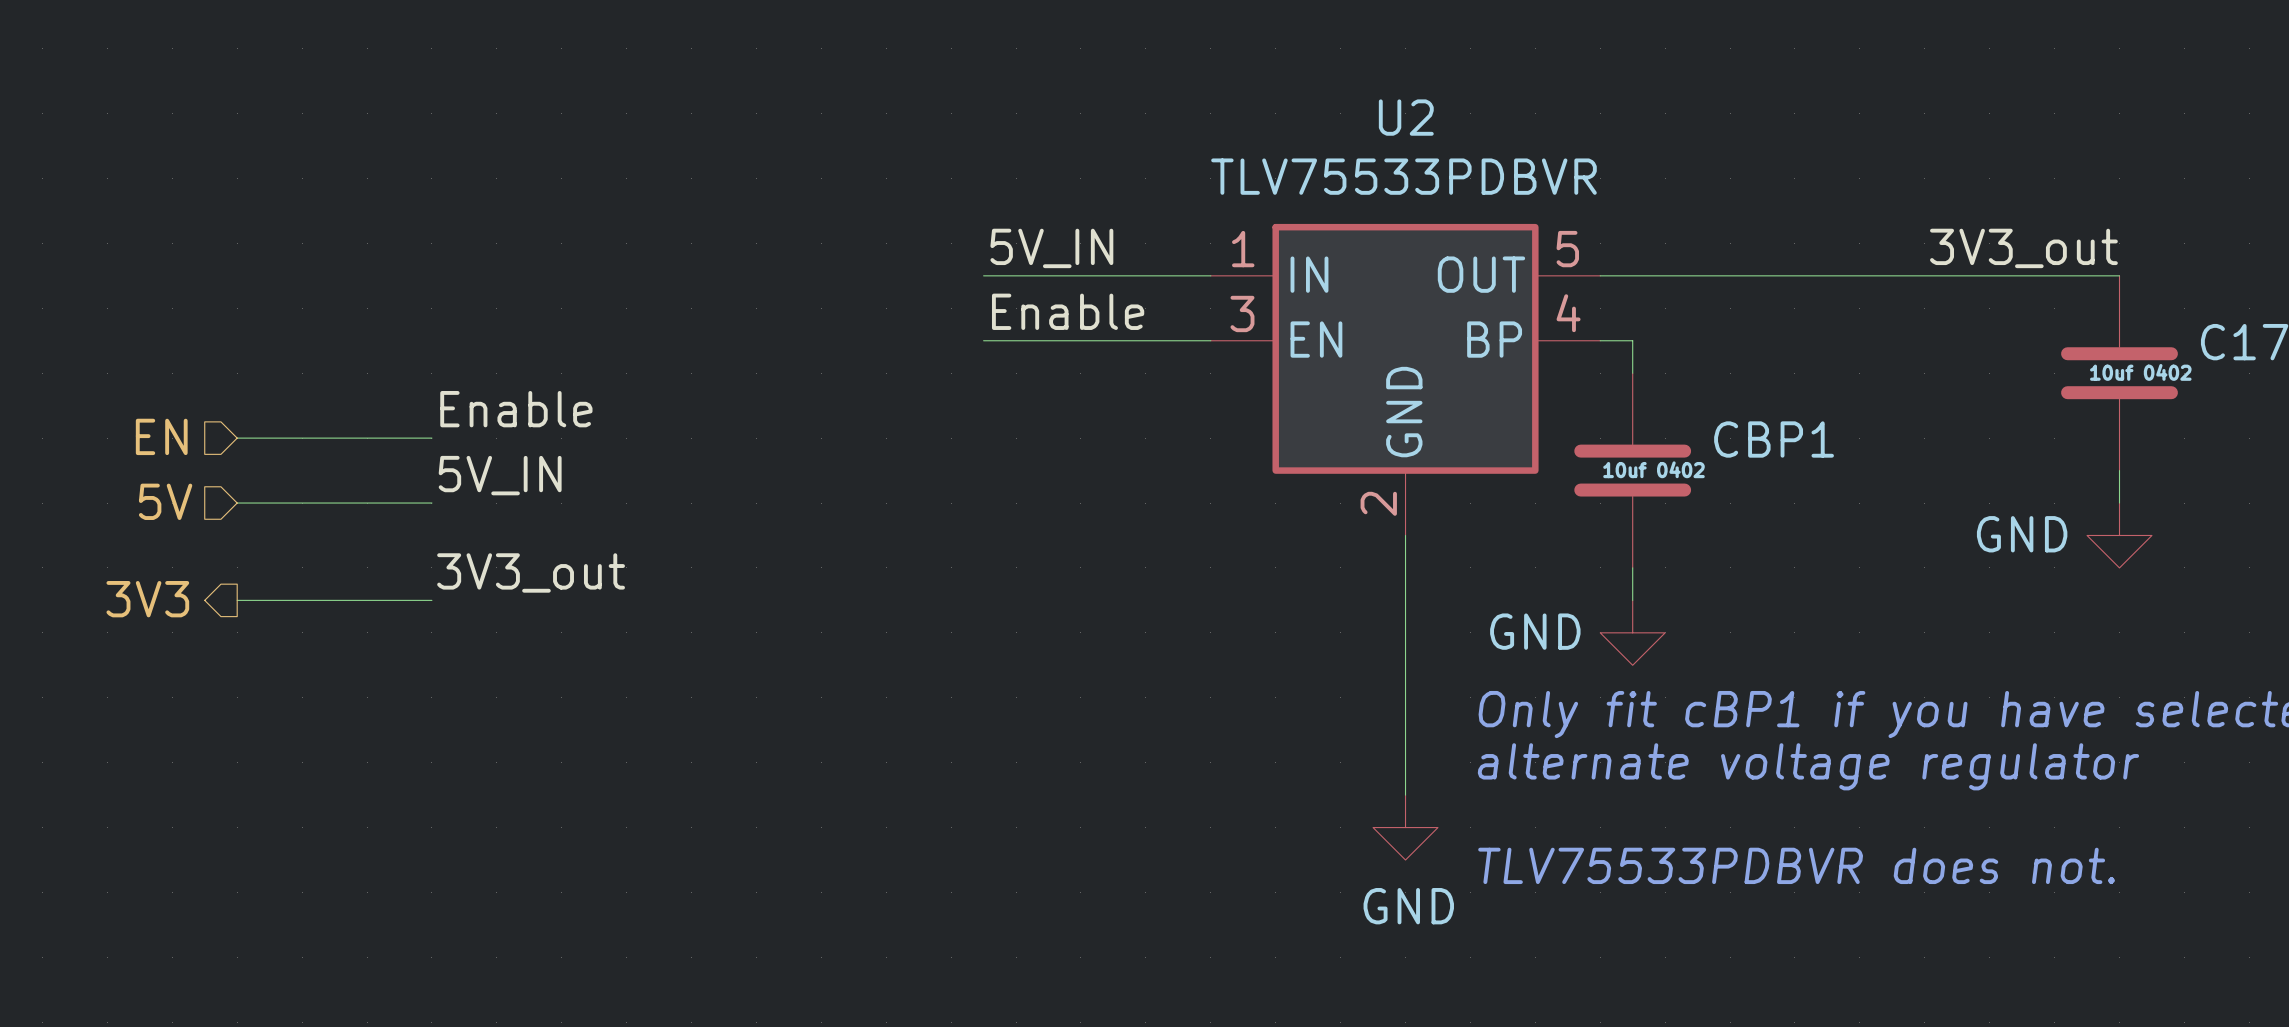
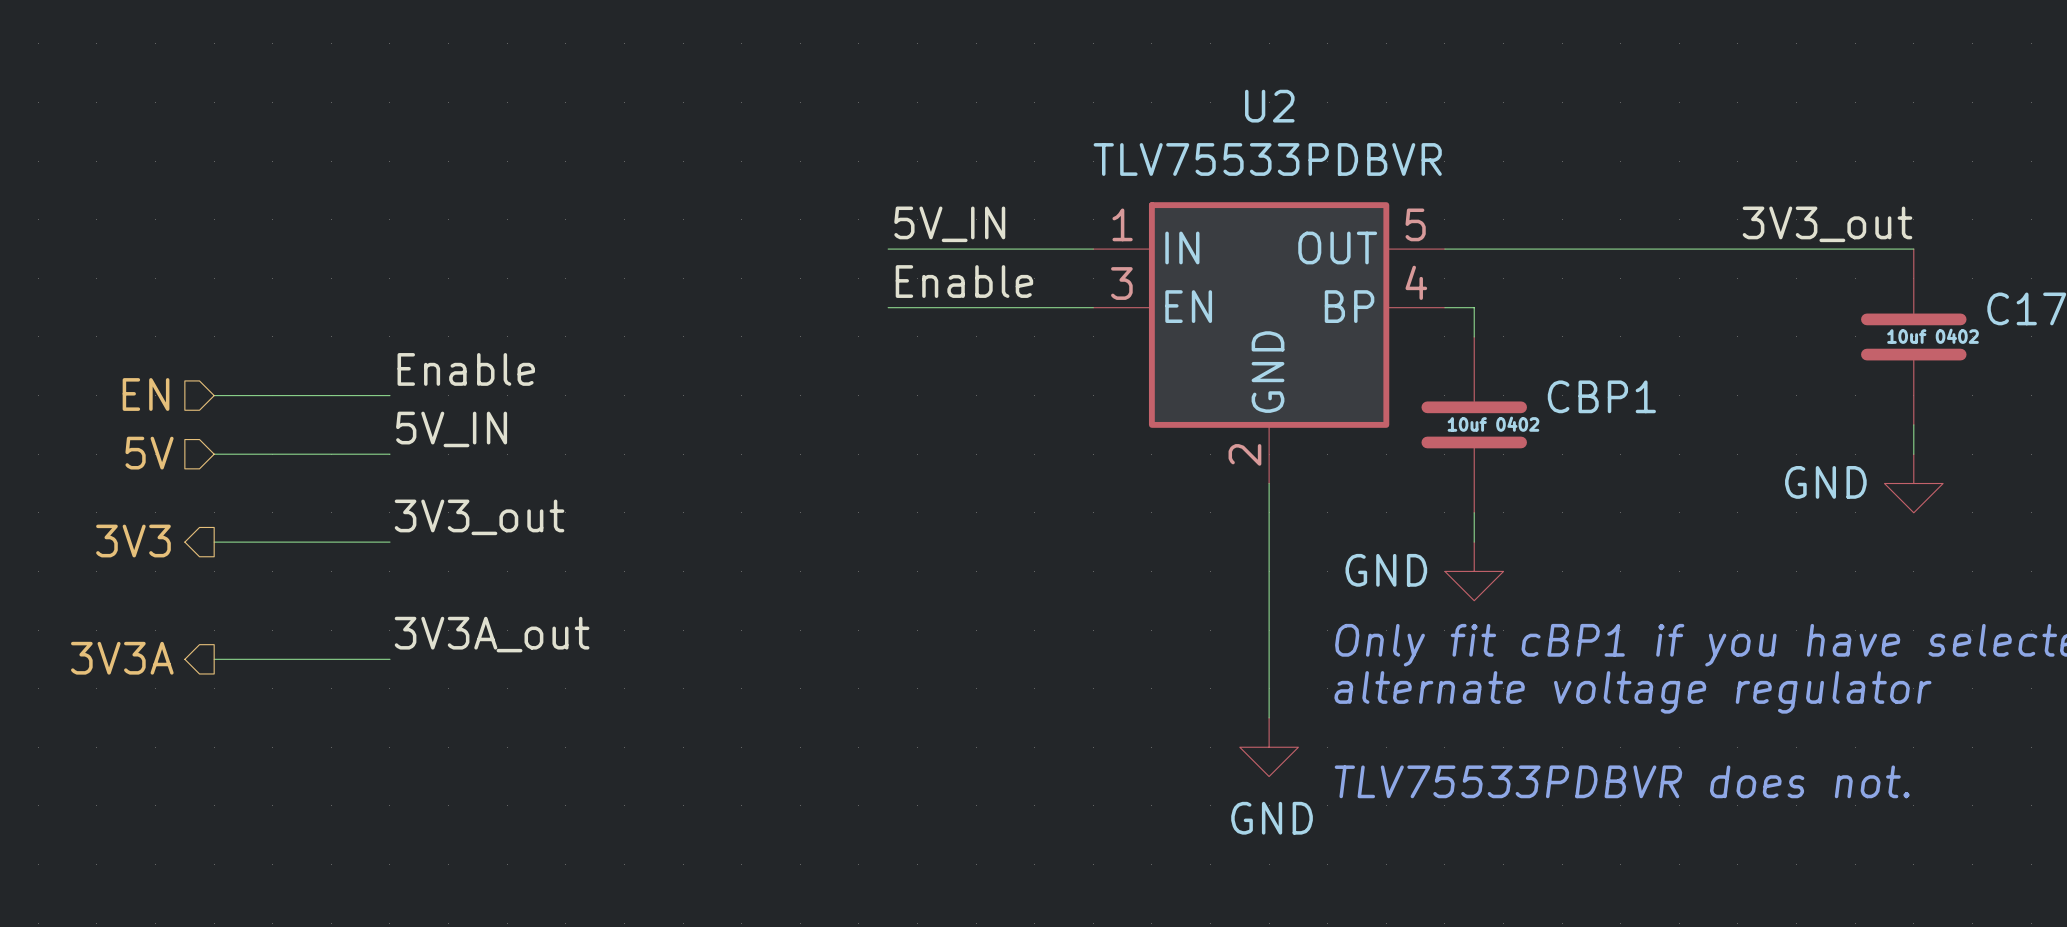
label: none -> 3V3A_out (492, 634)
hierarchical label: none -> 3V3A (122, 658)
wire: none -> (214, 659) (389, 659)

